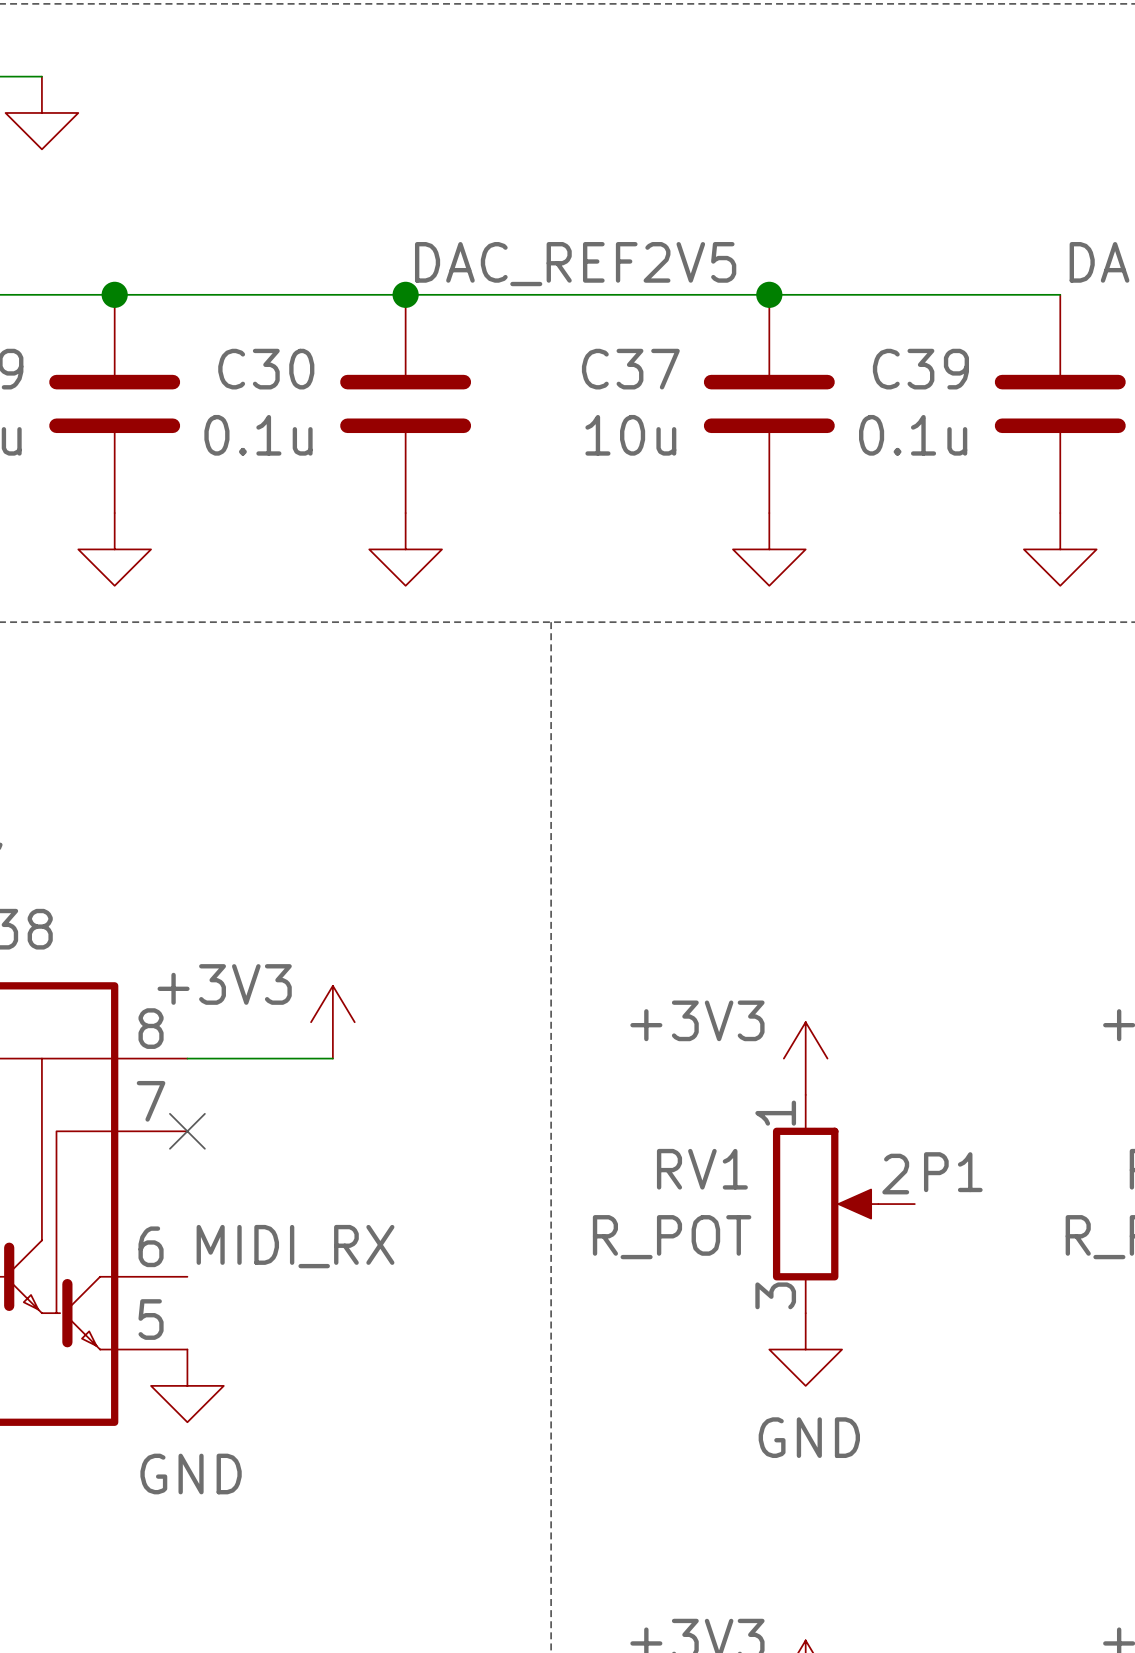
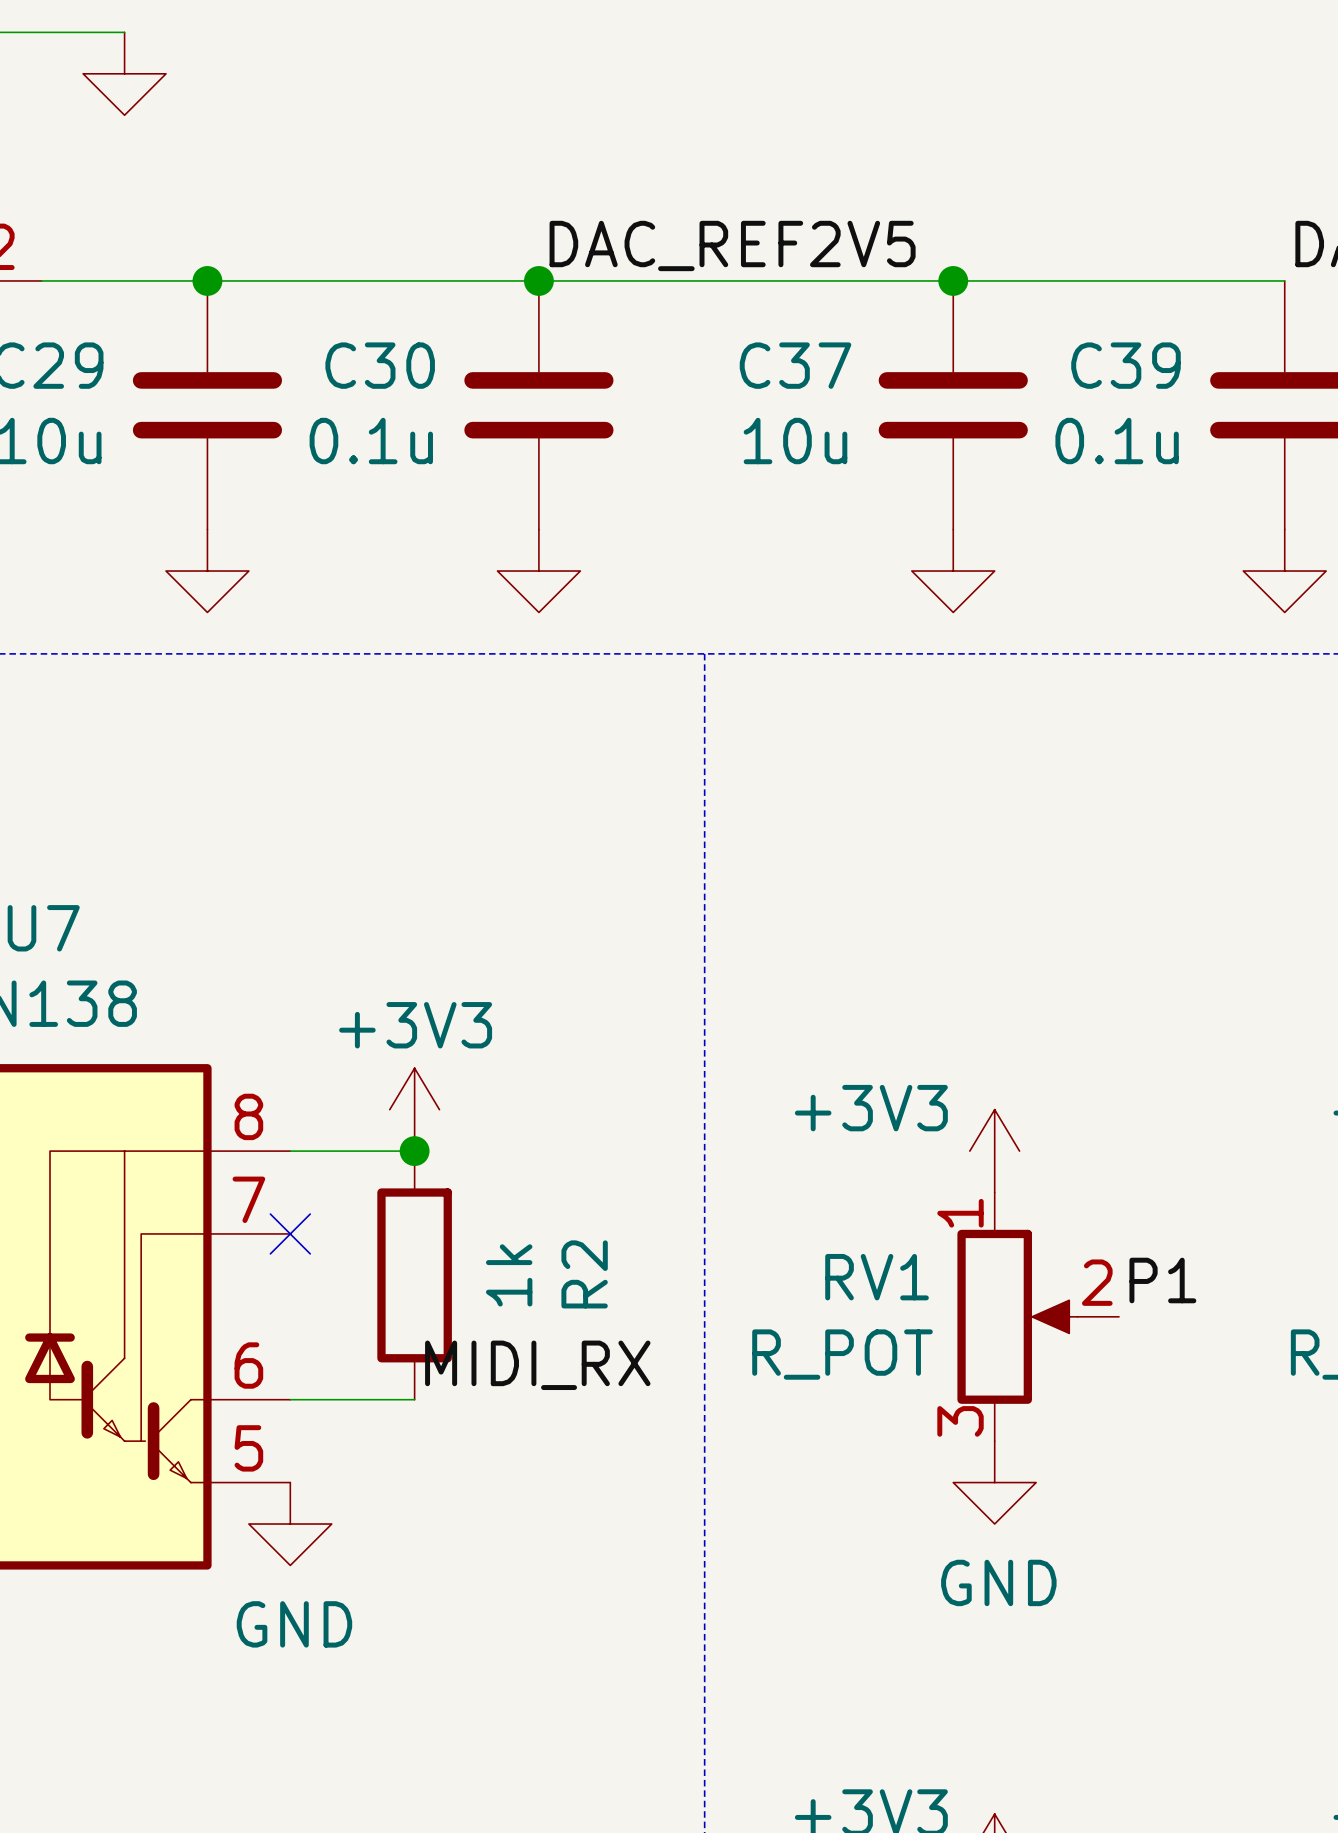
power symbol text position: +3V3 (224, 984) -> +3V3 (415, 1025)
power symbol position: +3V3 (332, 1022) -> +3V3 (414, 1109)
wire: (296, 1058) (332, 1058) -> none
junction: none -> (414, 1151)
R2: none -> 1k (414, 1275)
label position: MIDI_RX (295, 1246) -> MIDI_RX (537, 1365)
wire: none -> (290, 1399) (414, 1399)

